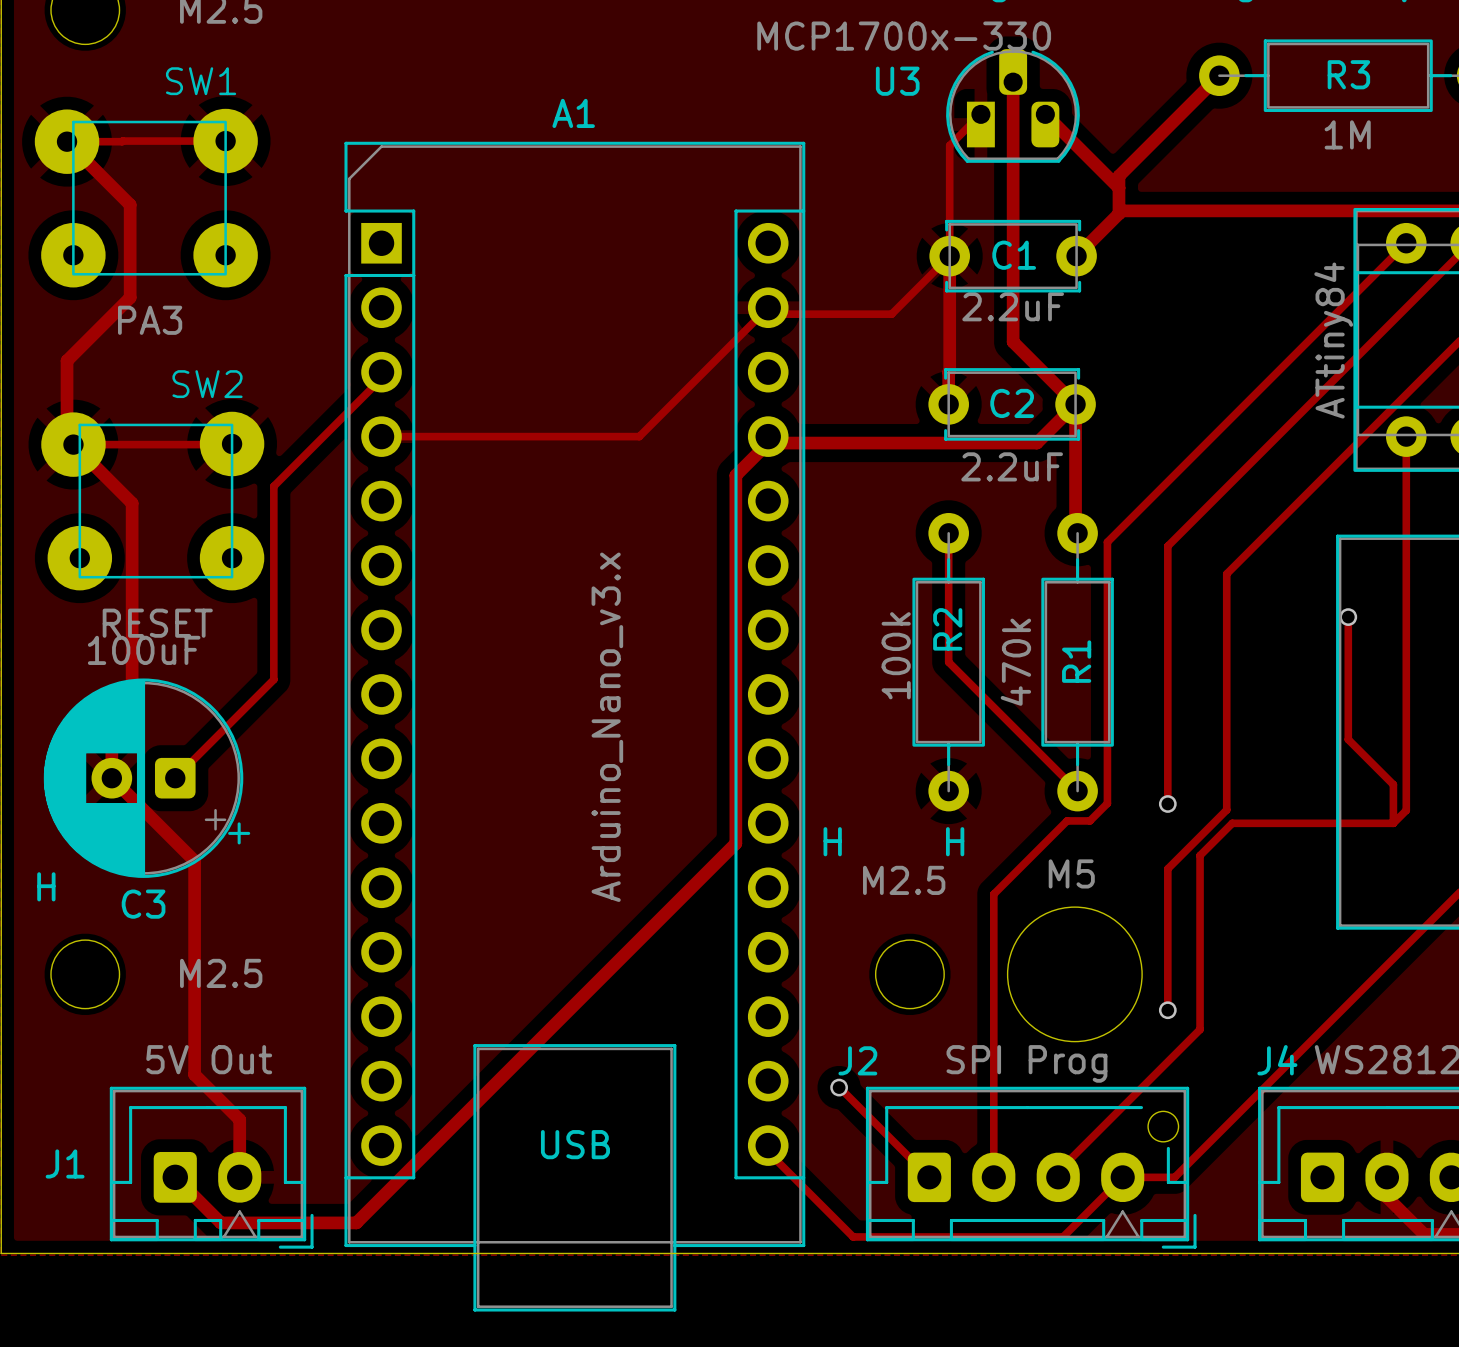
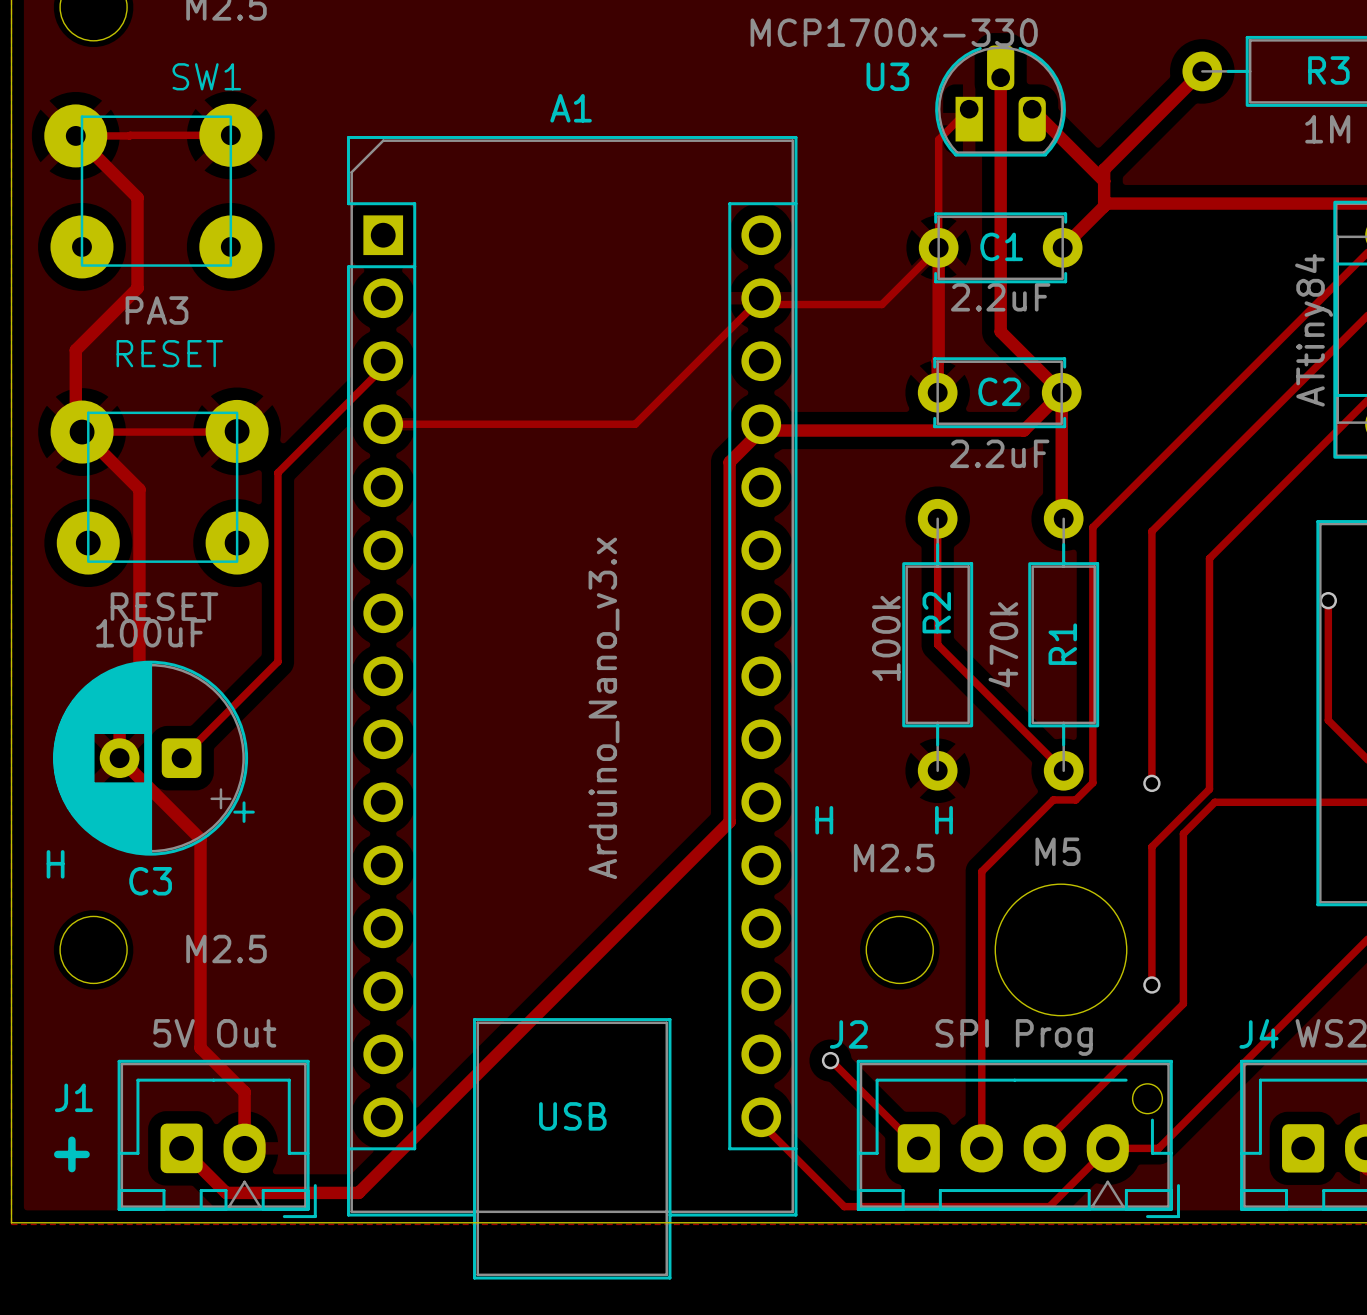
SW2: RESET (152, 501) -> none
RESET: none -> RESET (159, 487)
J1 name position: J1 (65, 1163) -> J1 (73, 1097)
text: none -> + (71, 1154)

